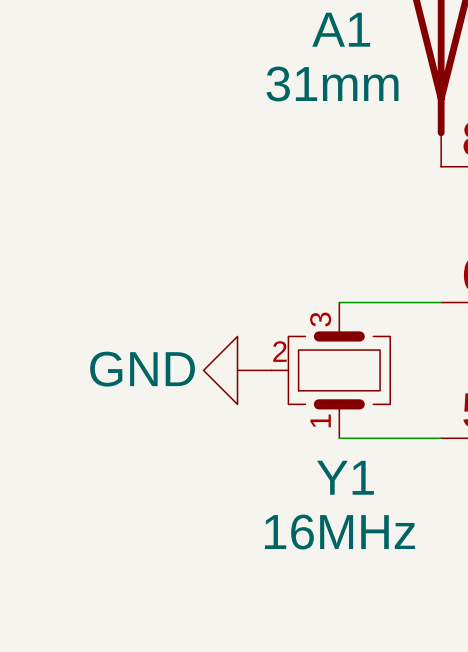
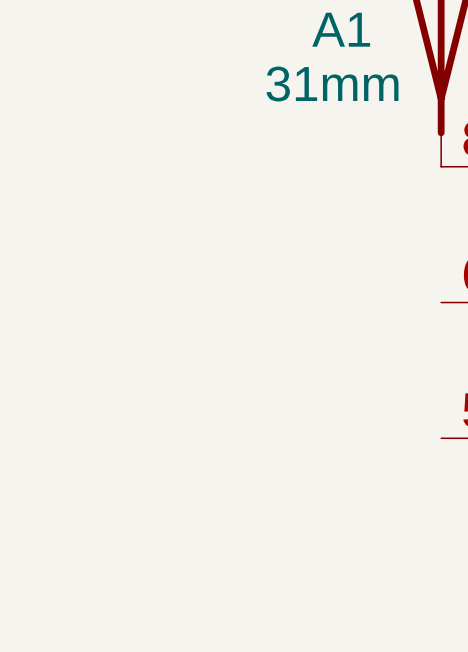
wire: (339, 302) (441, 302) -> none
power symbol: GND (237, 370) -> none
Y1: 16MHz (330, 370) -> none
wire: (339, 438) (441, 438) -> none

